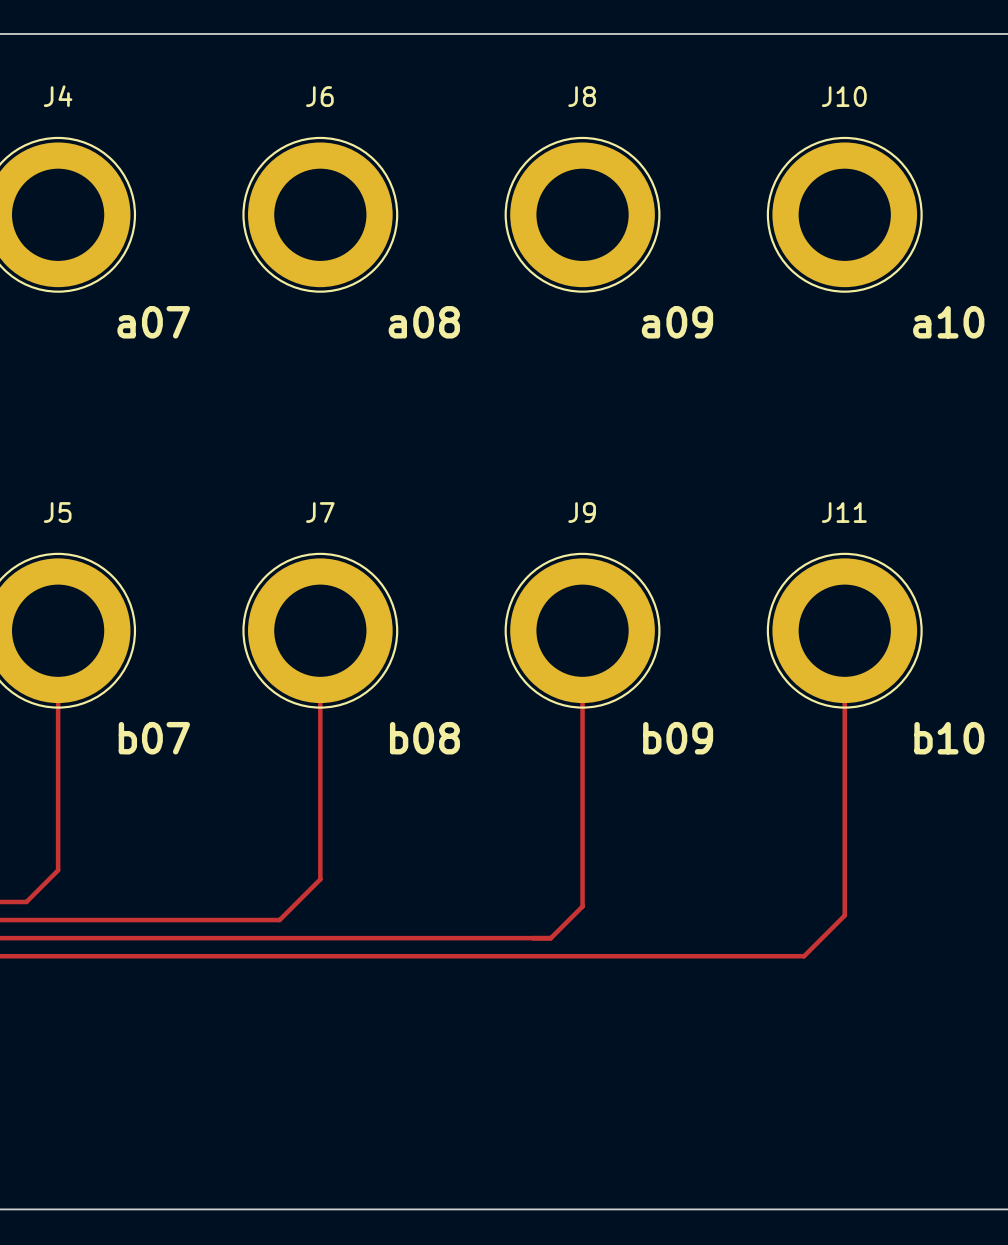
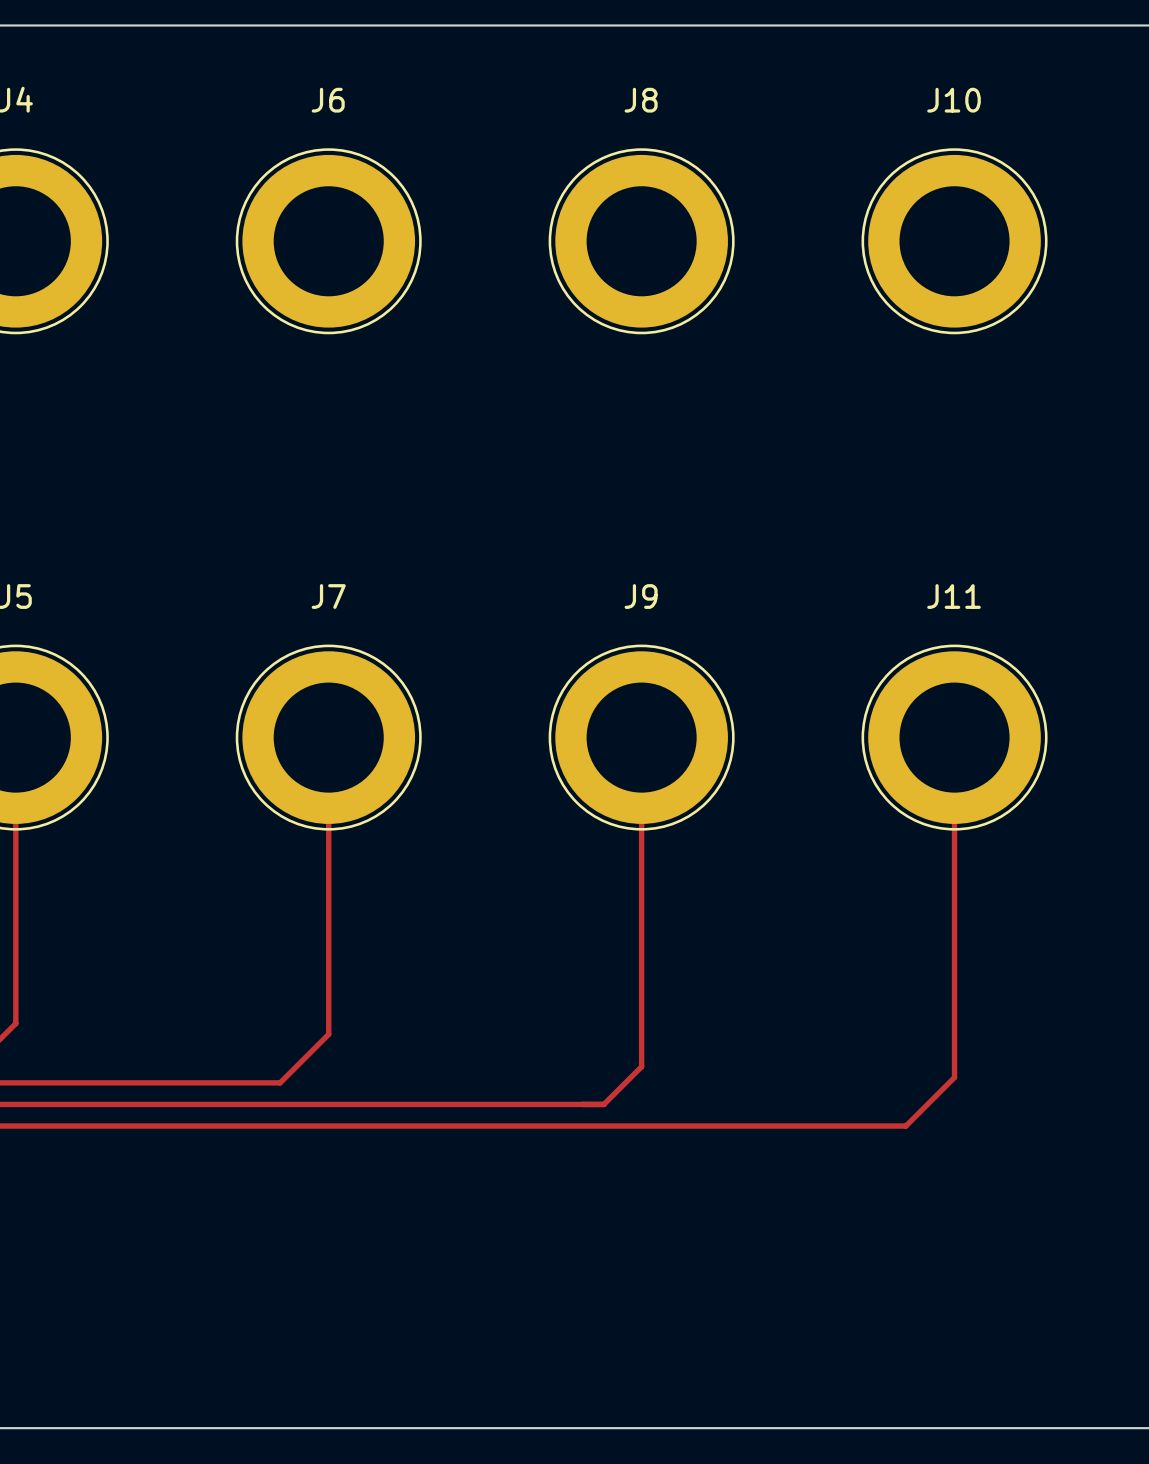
text: a07 (153, 322) -> none
text: a08 (424, 322) -> none
text: a09 (677, 322) -> none
text: a10 (948, 322) -> none
text: b07 (154, 738) -> none
text: b08 (424, 738) -> none
text: b09 (678, 738) -> none
text: b10 (949, 738) -> none

